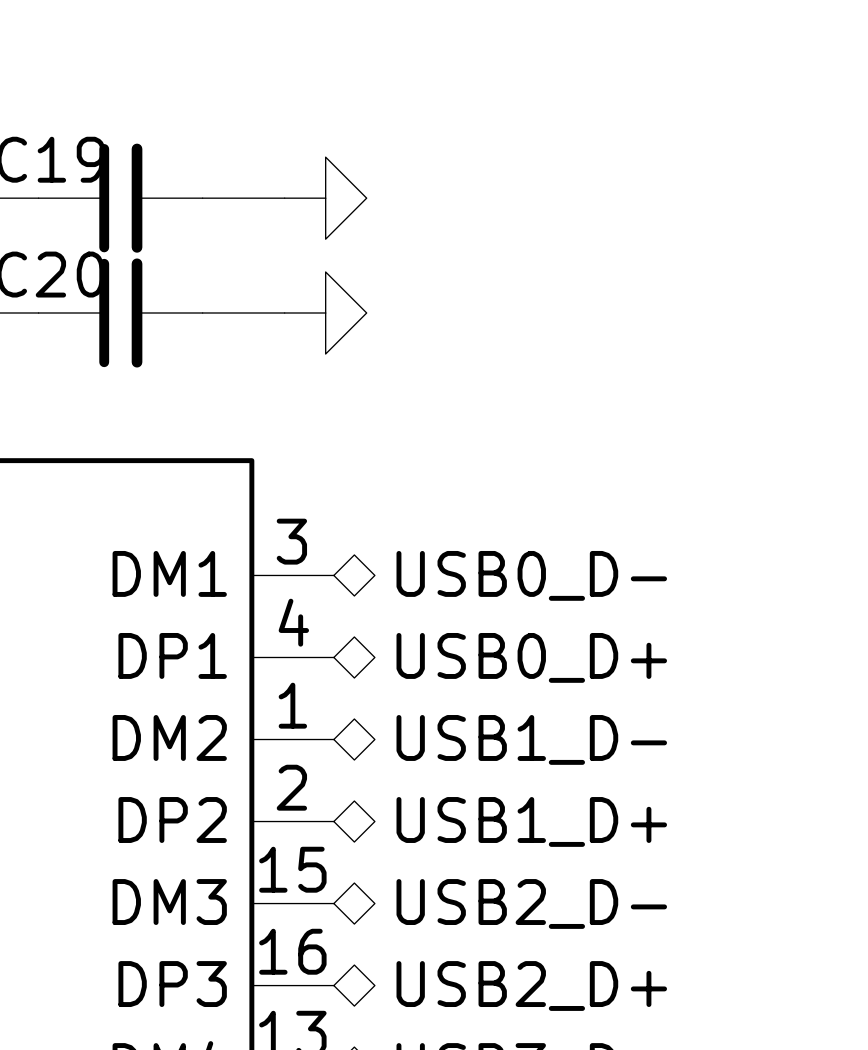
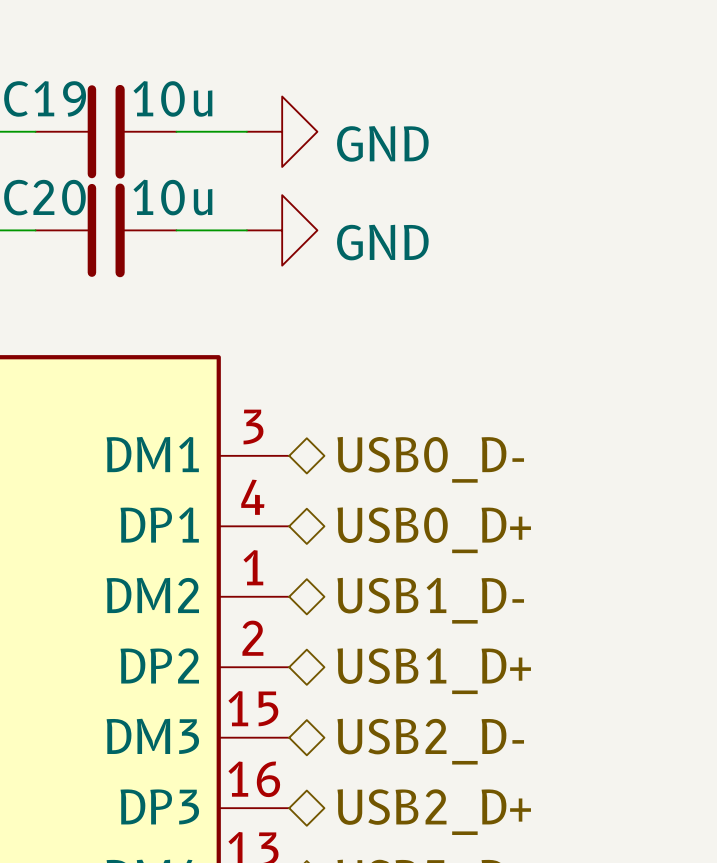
C19 value: none -> 10u (172, 98)
power symbol text: none -> GND (382, 143)
C20 value: none -> 10u (172, 197)
power symbol text: none -> GND (382, 242)

